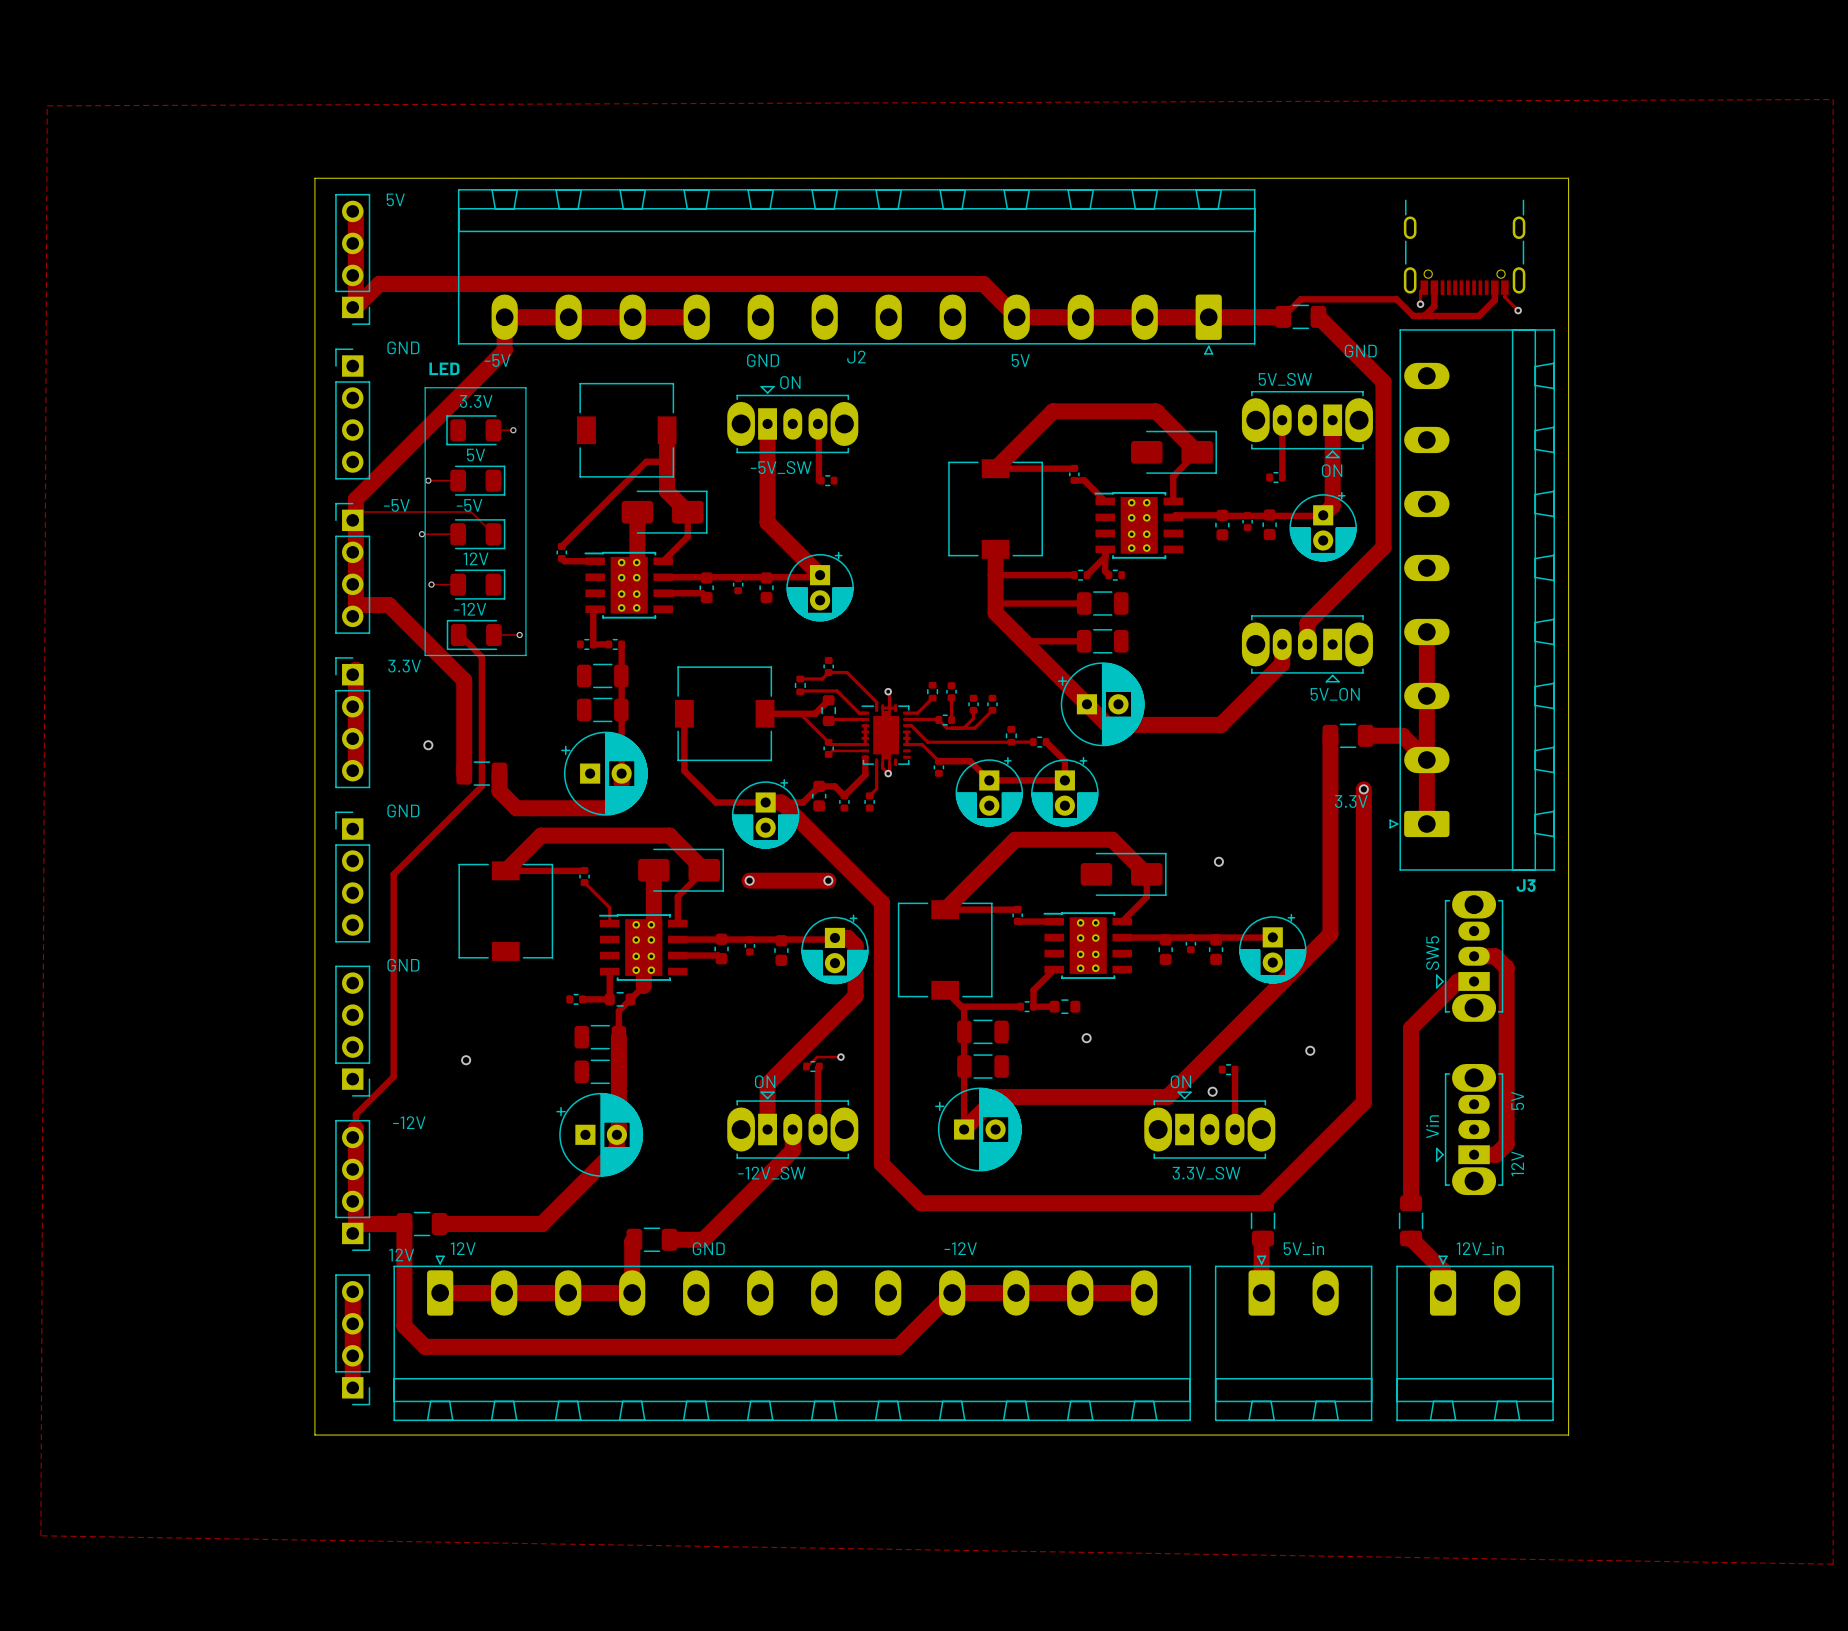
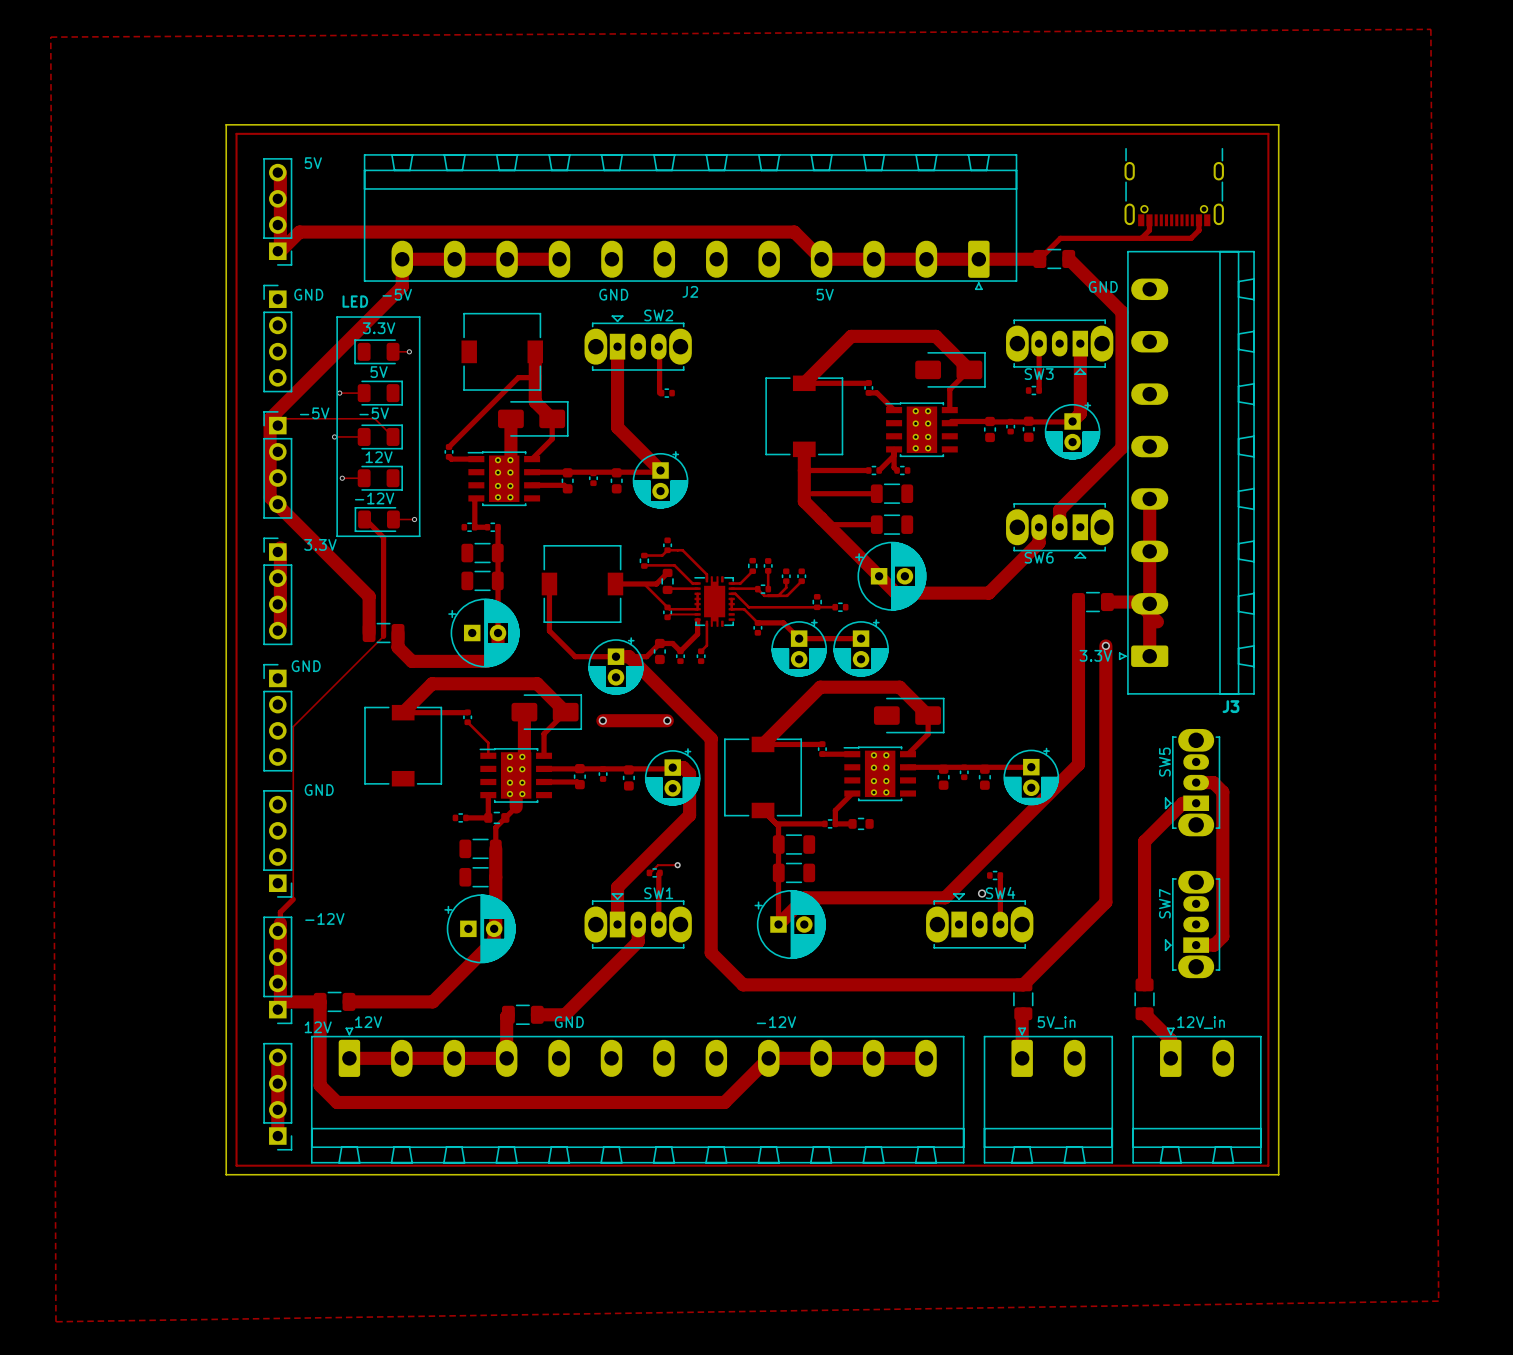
zone outline: (1833, 99) (47, 105) (40, 1535) (1833, 1564) (1833, 99) -> (1430, 29) (50, 37) (55, 1321) (1438, 1301) (1430, 29)
track: none -> (236, 133) (1268, 133) (1268, 1165) (236, 1165) (236, 133)
part position: (1464, 247) -> (1174, 187)
track: none -> (1149, 220) (1149, 230) (1141, 238)
track: (1424, 287) (1420, 291) (1420, 304) -> none
track: (1434, 287) (1434, 306) (1424, 315) -> none
track: (1494, 287) (1494, 300) (1478, 315) (1413, 315) (1396, 299) (1300, 299) -> (1198, 220) (1198, 230) (1191, 238) (1060, 238) (1054, 244)
track: (1504, 287) (1504, 297) (1518, 310) -> none
via: (1420, 304) -> none
via: (1518, 310) -> none
text position: GND (403, 347) -> GND (308, 294)
5V_SW name: 5V_SW (1285, 379) -> SW3 (1039, 374)
text: ON (790, 382) -> none
-5V_SW name: -5V_SW (781, 467) -> SW2 (658, 315)
text: ON (1332, 470) -> none
track: (355, 499) (355, 605) (388, 605) (464, 680) (464, 728) -> (280, 408) (270, 418) (270, 497) (369, 596)
J3 position: (1472, 599) -> (1186, 472)
track: (1426, 631) (1426, 823) -> (1149, 498) (1149, 656)
SW6 name: none -> SW6 (1039, 557)
track: (888, 691) (889, 708) -> none
via: (888, 691) -> none
text: 5V_ON (1335, 694) -> none
track: (882, 708) (895, 708) -> none
track: (1046, 742) (1064, 760) (1064, 780) -> none
via: (428, 745) -> none
track: (882, 762) (882, 768) (888, 773) (889, 762) -> none
via: (888, 773) -> none
track: (481, 777) (481, 786) (393, 874) (393, 1076) (371, 1098) -> (383, 636) (293, 726) (293, 899)
text position: GND (403, 810) -> GND (306, 666)
via: (1218, 861) -> none
SW5 name position: SW5 (1432, 953) -> SW5 (1164, 762)
via: (1086, 1038) -> none
via: (1310, 1050) -> none
via: (466, 1060) -> none
text: ON (765, 1081) -> none
text: ON (1180, 1081) -> none
SW1 name: none -> SW1 (658, 893)
SW4 name: none -> SW4 (1000, 893)
text: 5V (1517, 1100) -> none
Vin name: Vin (1432, 1126) -> SW7 (1164, 903)
text: 12V (1517, 1163) -> none
text: -12V_SW (771, 1173) -> none
text: 3.3V_SW (1206, 1173) -> none
board edge: (314, 1435) (314, 178) (1568, 178) (1568, 1435) -> (246, 1174) (226, 1174) (226, 124) (1278, 124) (1278, 1174) (1273, 1174)

